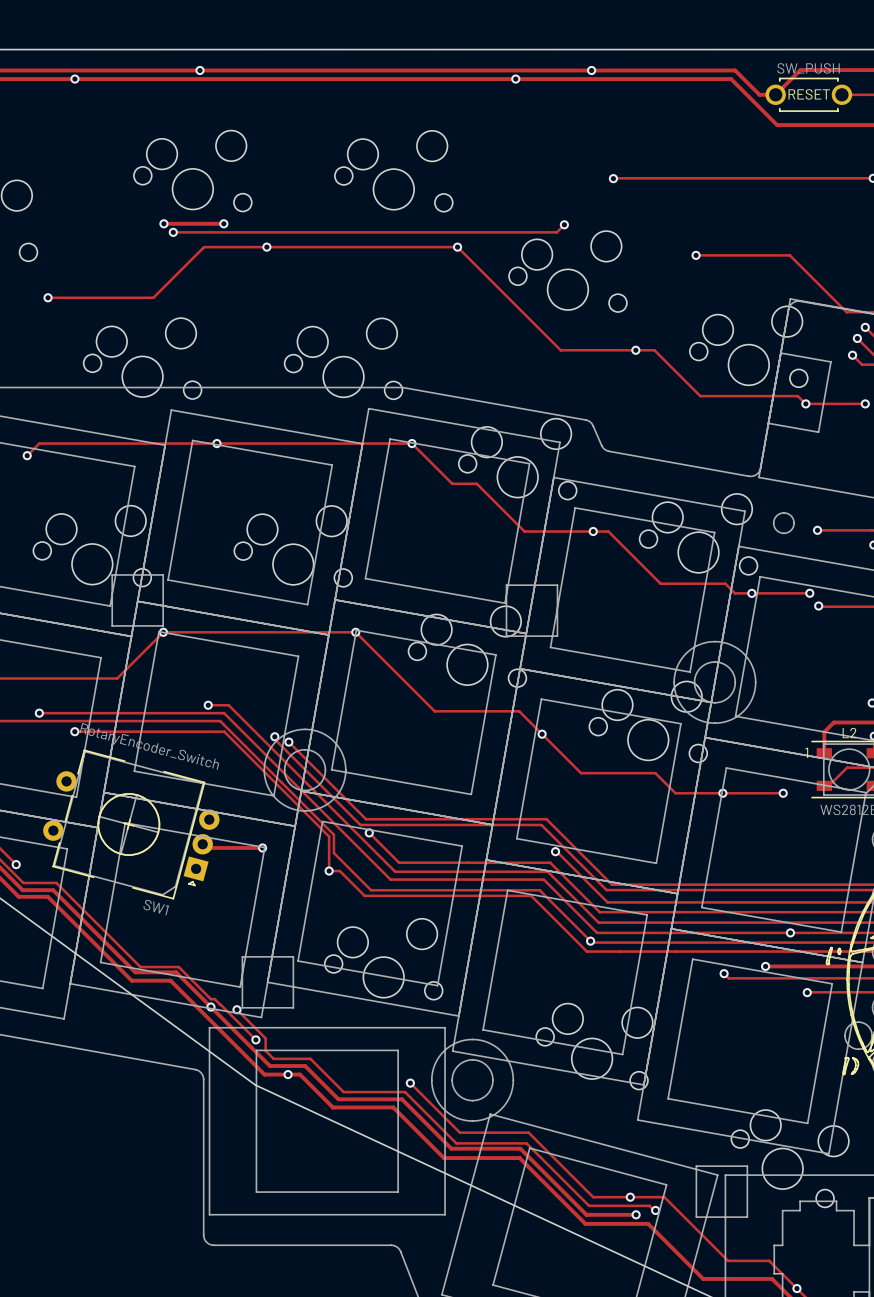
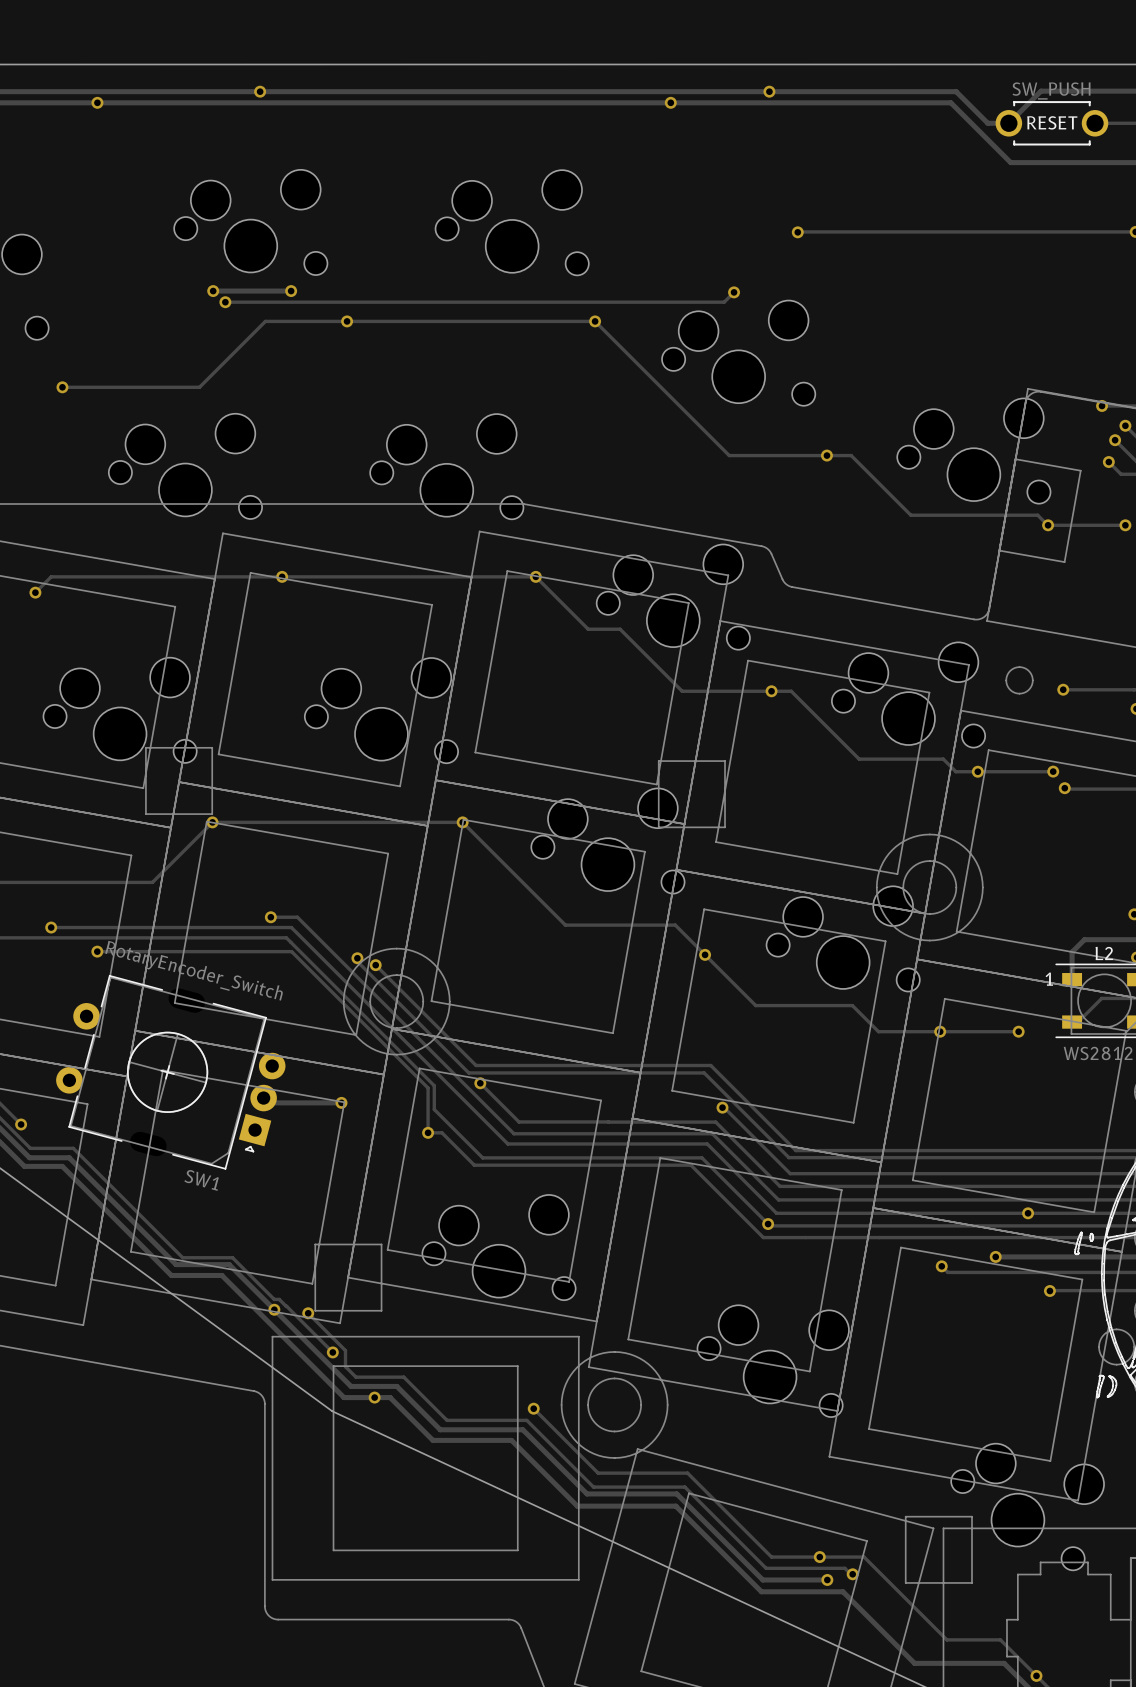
track: (696, 255) (789, 255) (847, 312) -> none
via: (696, 255) -> none
via: none -> (1102, 405)

